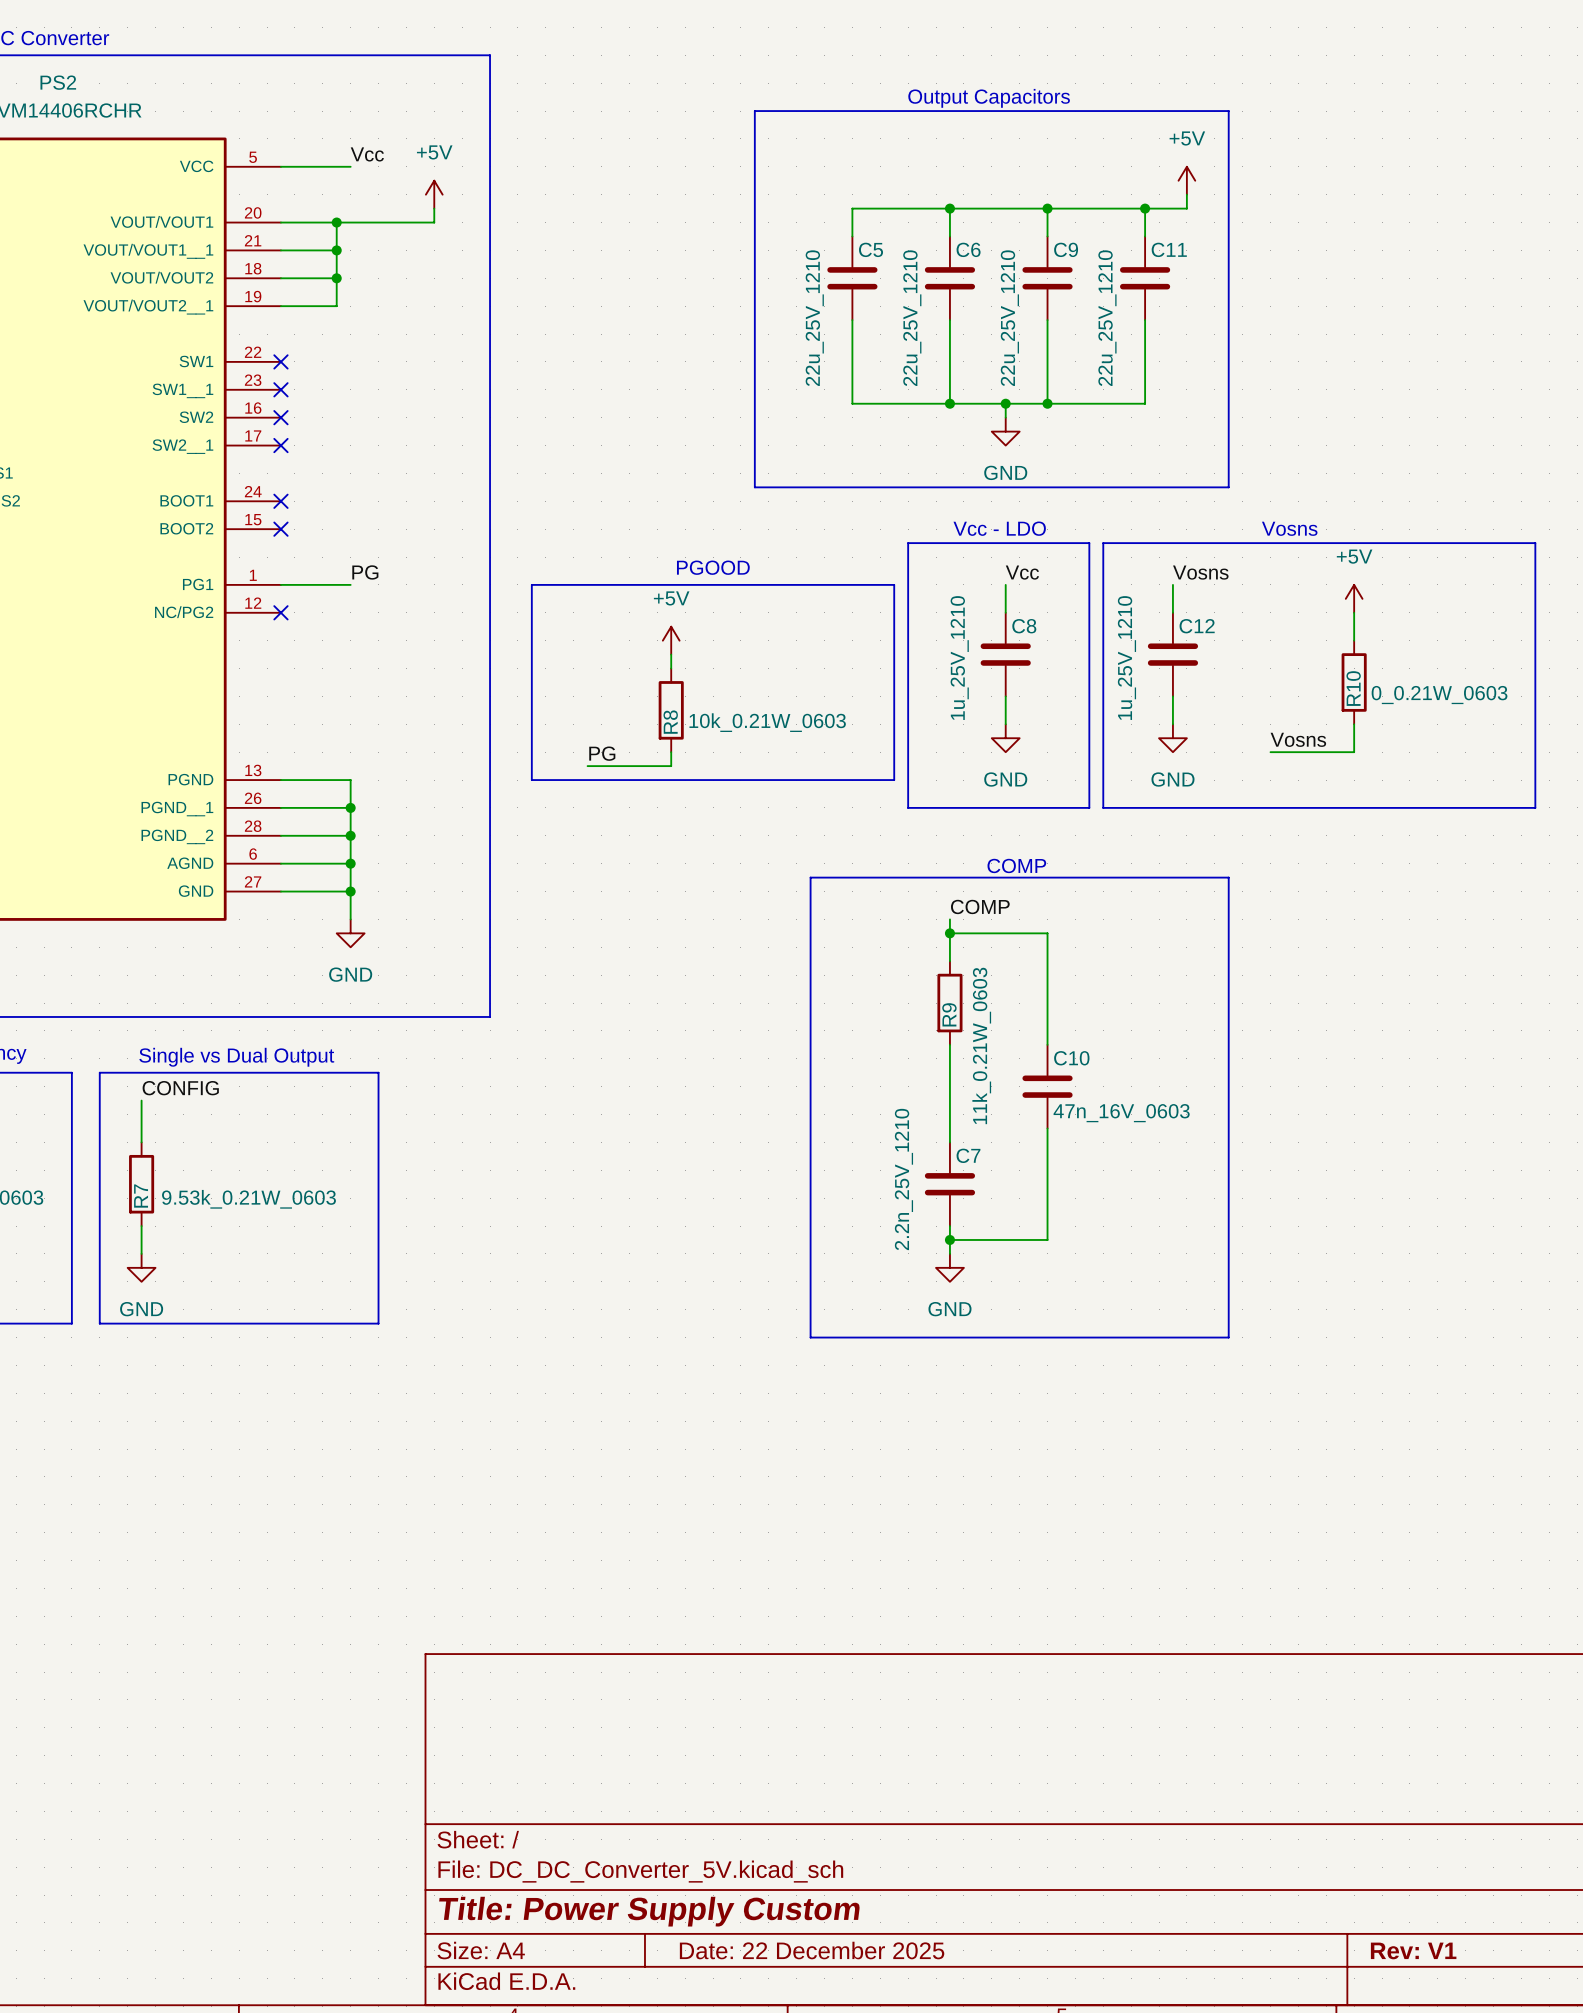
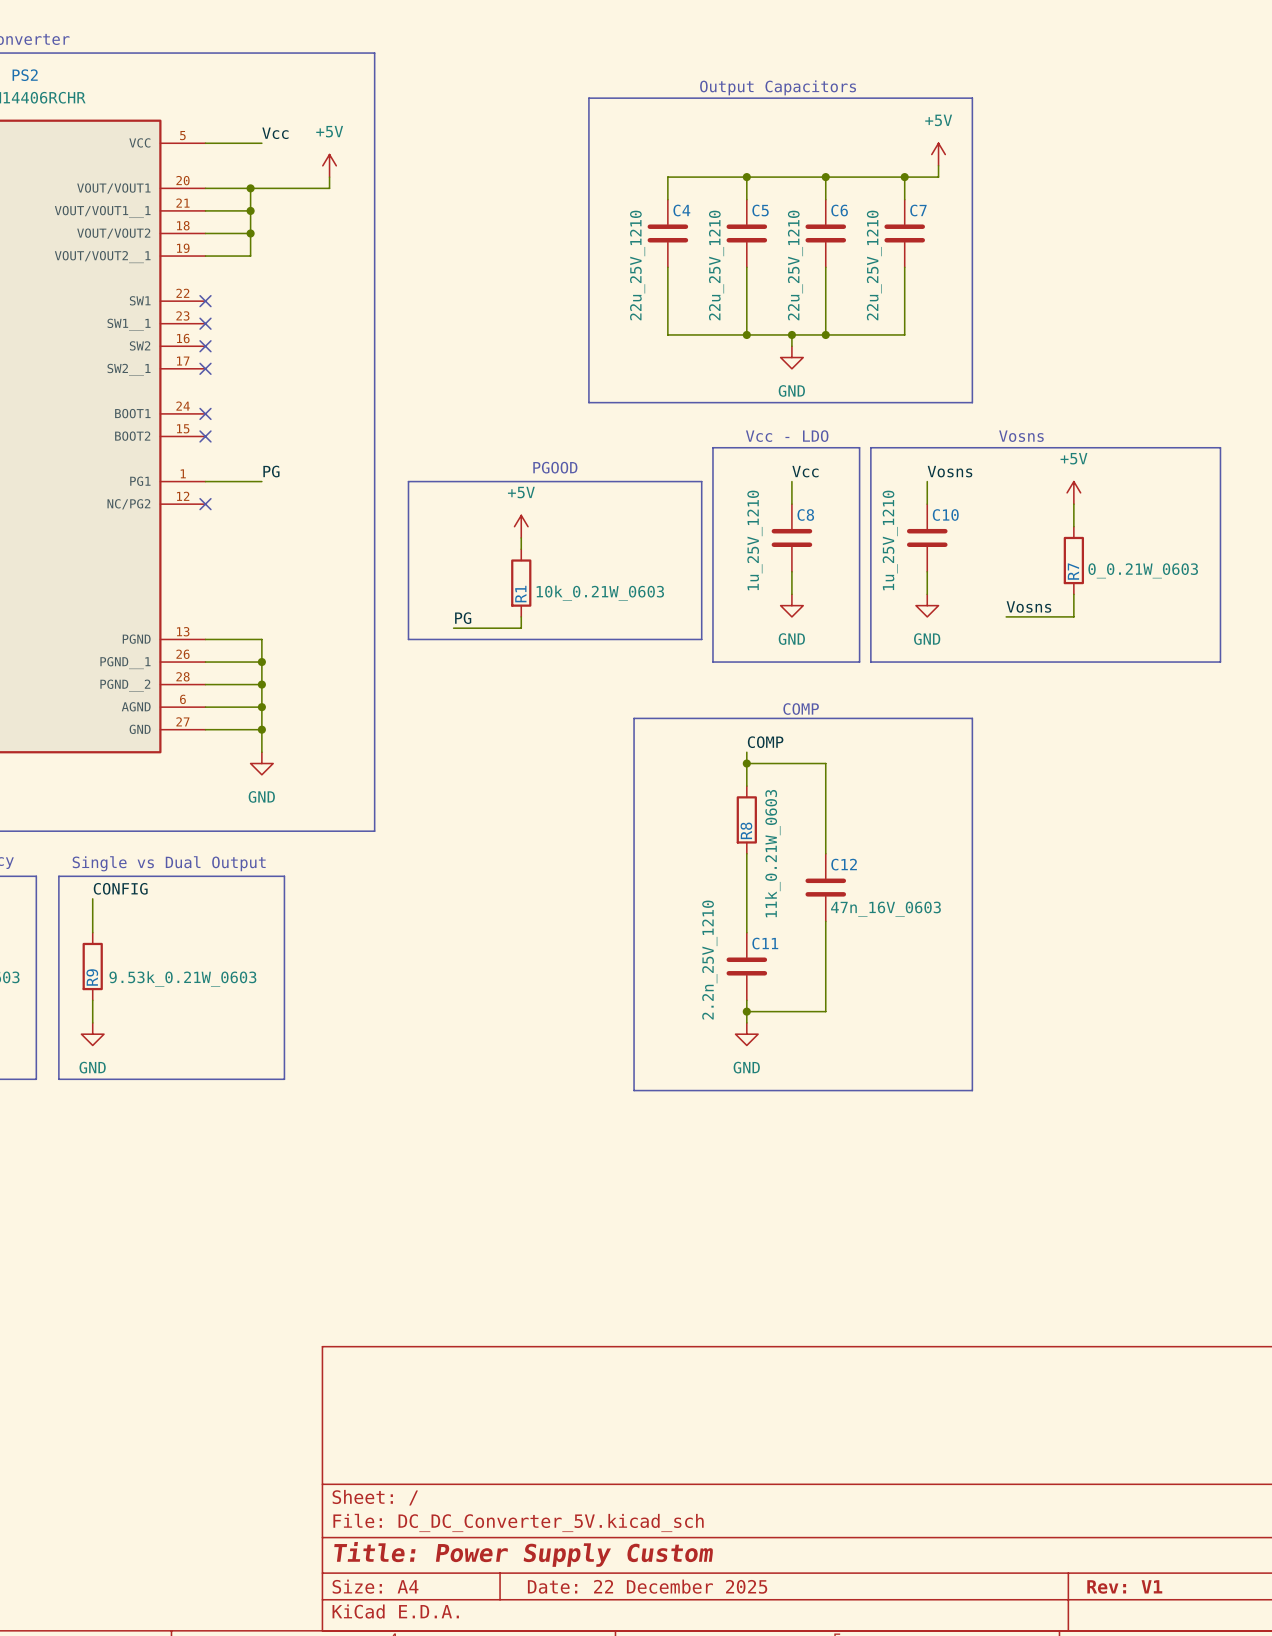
C5 name: C5 (871, 249) -> C4 (681, 210)
C6 name: C6 (968, 249) -> C5 (760, 210)
C9 name: C9 (1066, 249) -> C6 (839, 210)
C11 name: C11 (1169, 249) -> C7 (918, 210)
C12 name: C12 (1197, 626) -> C10 (945, 515)
R10 name: R10 (1353, 688) -> R7 (1073, 571)
R8 name: R8 (670, 722) -> R1 (520, 594)
R9 name: R9 (949, 1014) -> R8 (746, 830)
C10 name: C10 (1071, 1058) -> C12 (844, 864)
C7 name: C7 (968, 1155) -> C11 (765, 943)
R7 name: R7 (141, 1196) -> R9 (92, 977)

